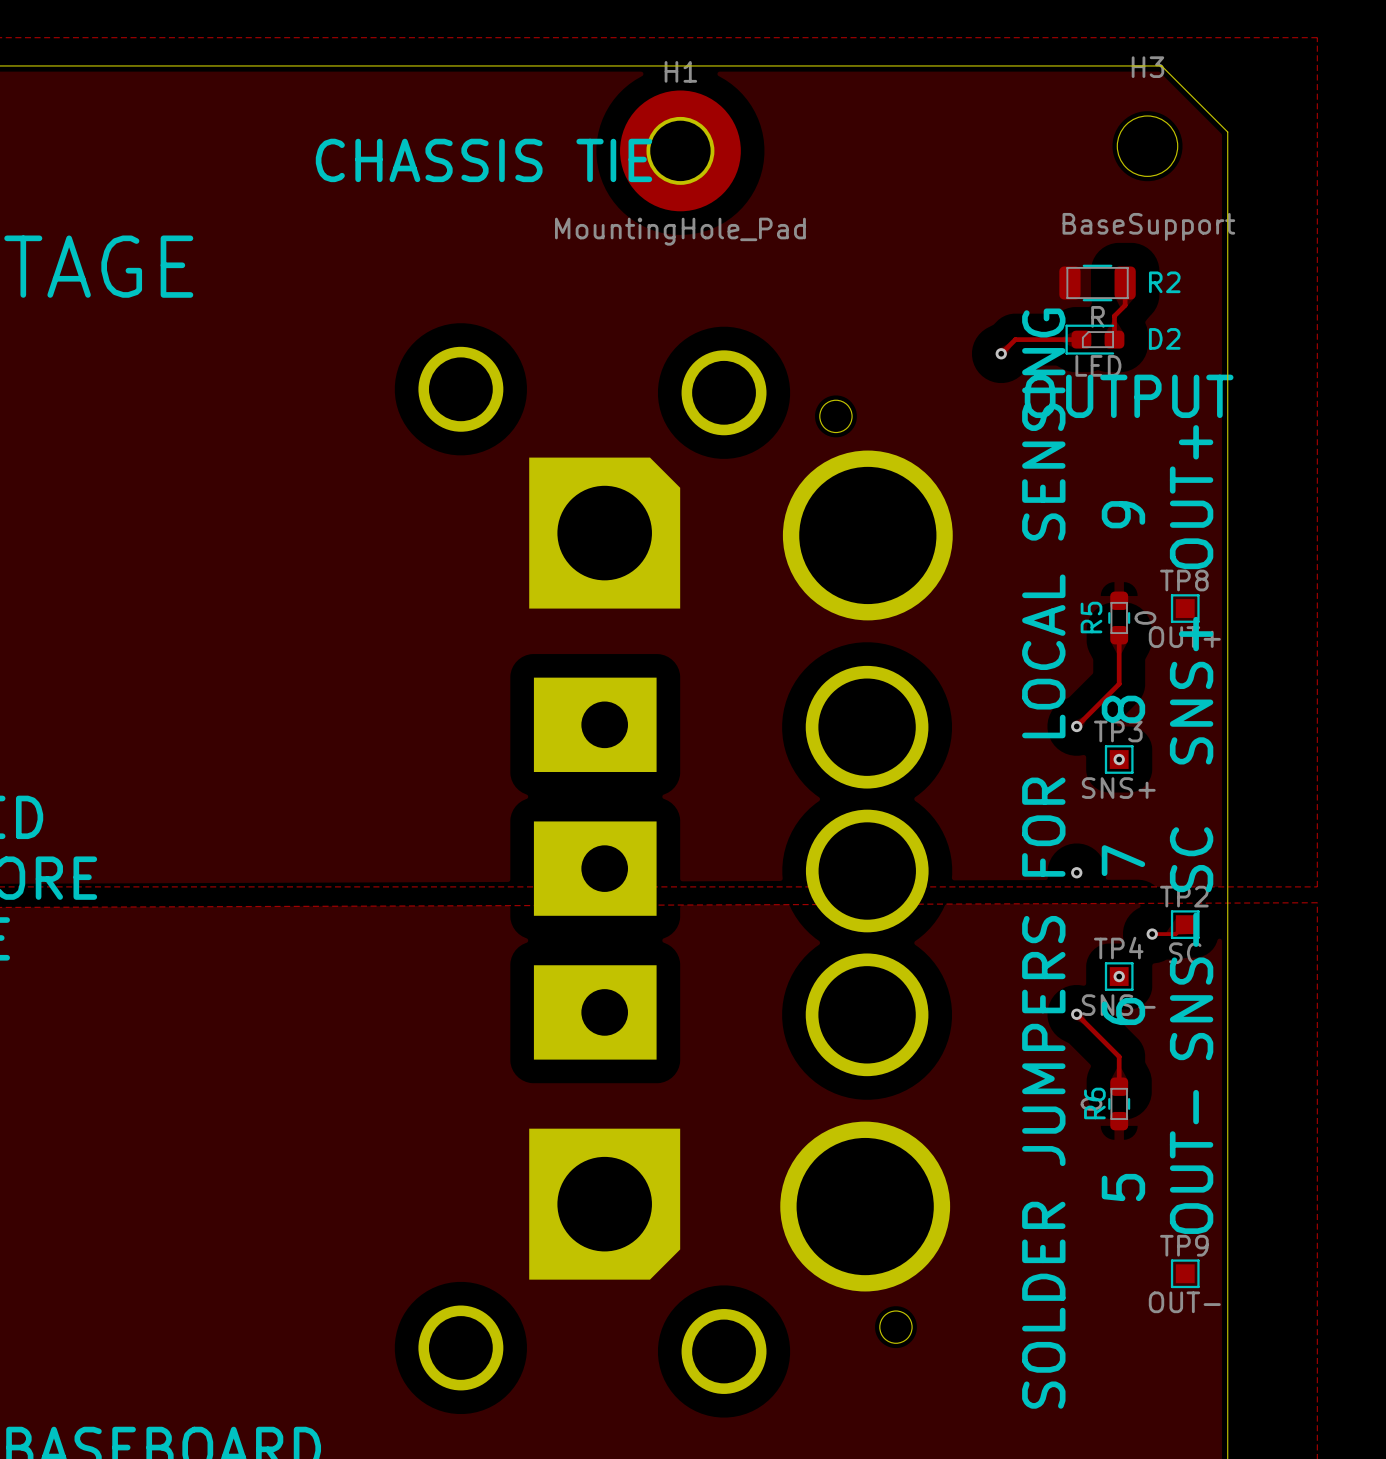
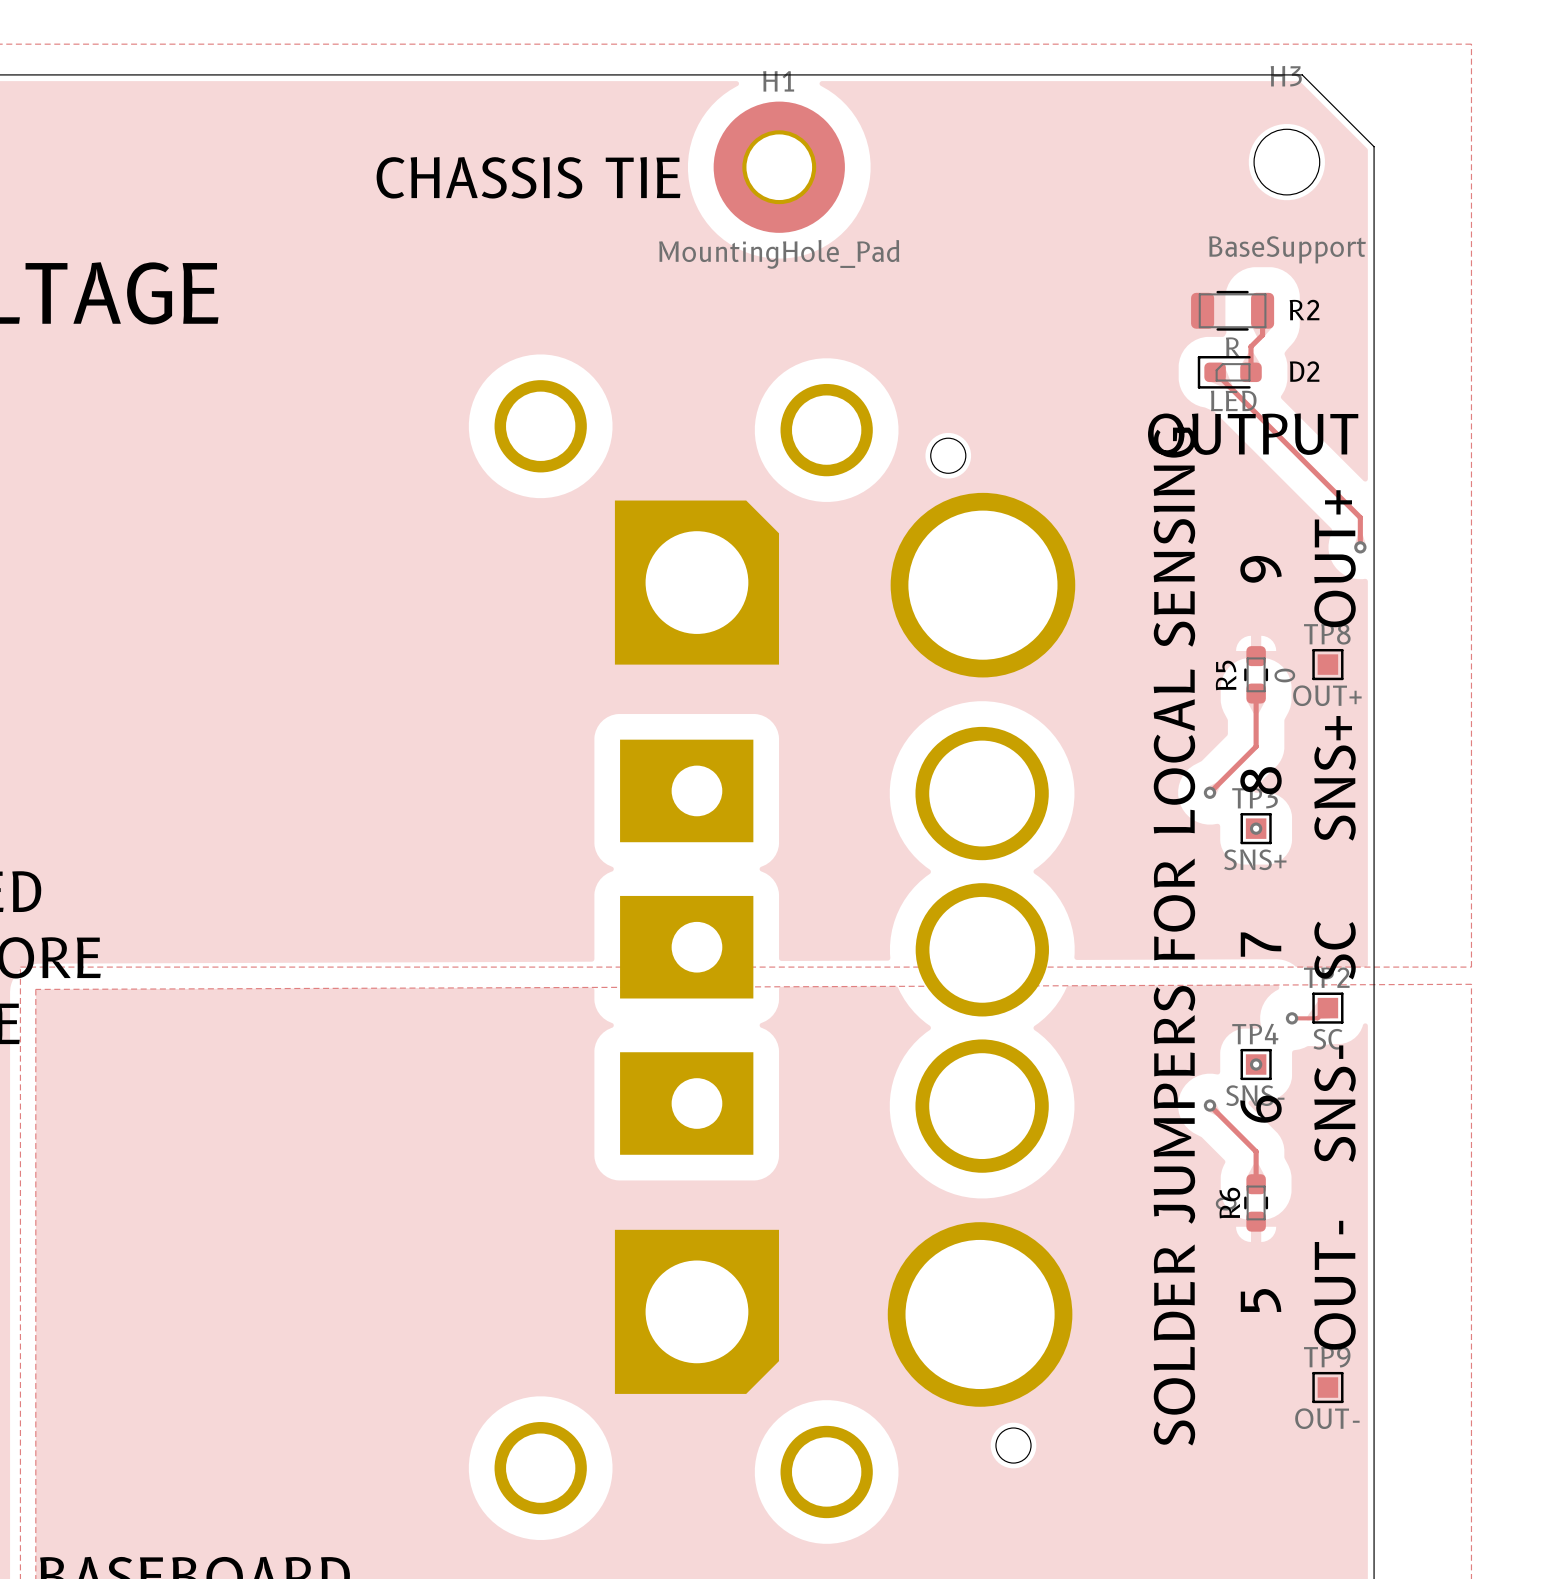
track: (1081, 339) (1015, 339) (1001, 353) -> (1215, 372) (1360, 517) (1360, 547)
via: (1001, 353) -> none
via: none -> (1360, 547)
via: (1076, 872) -> none

